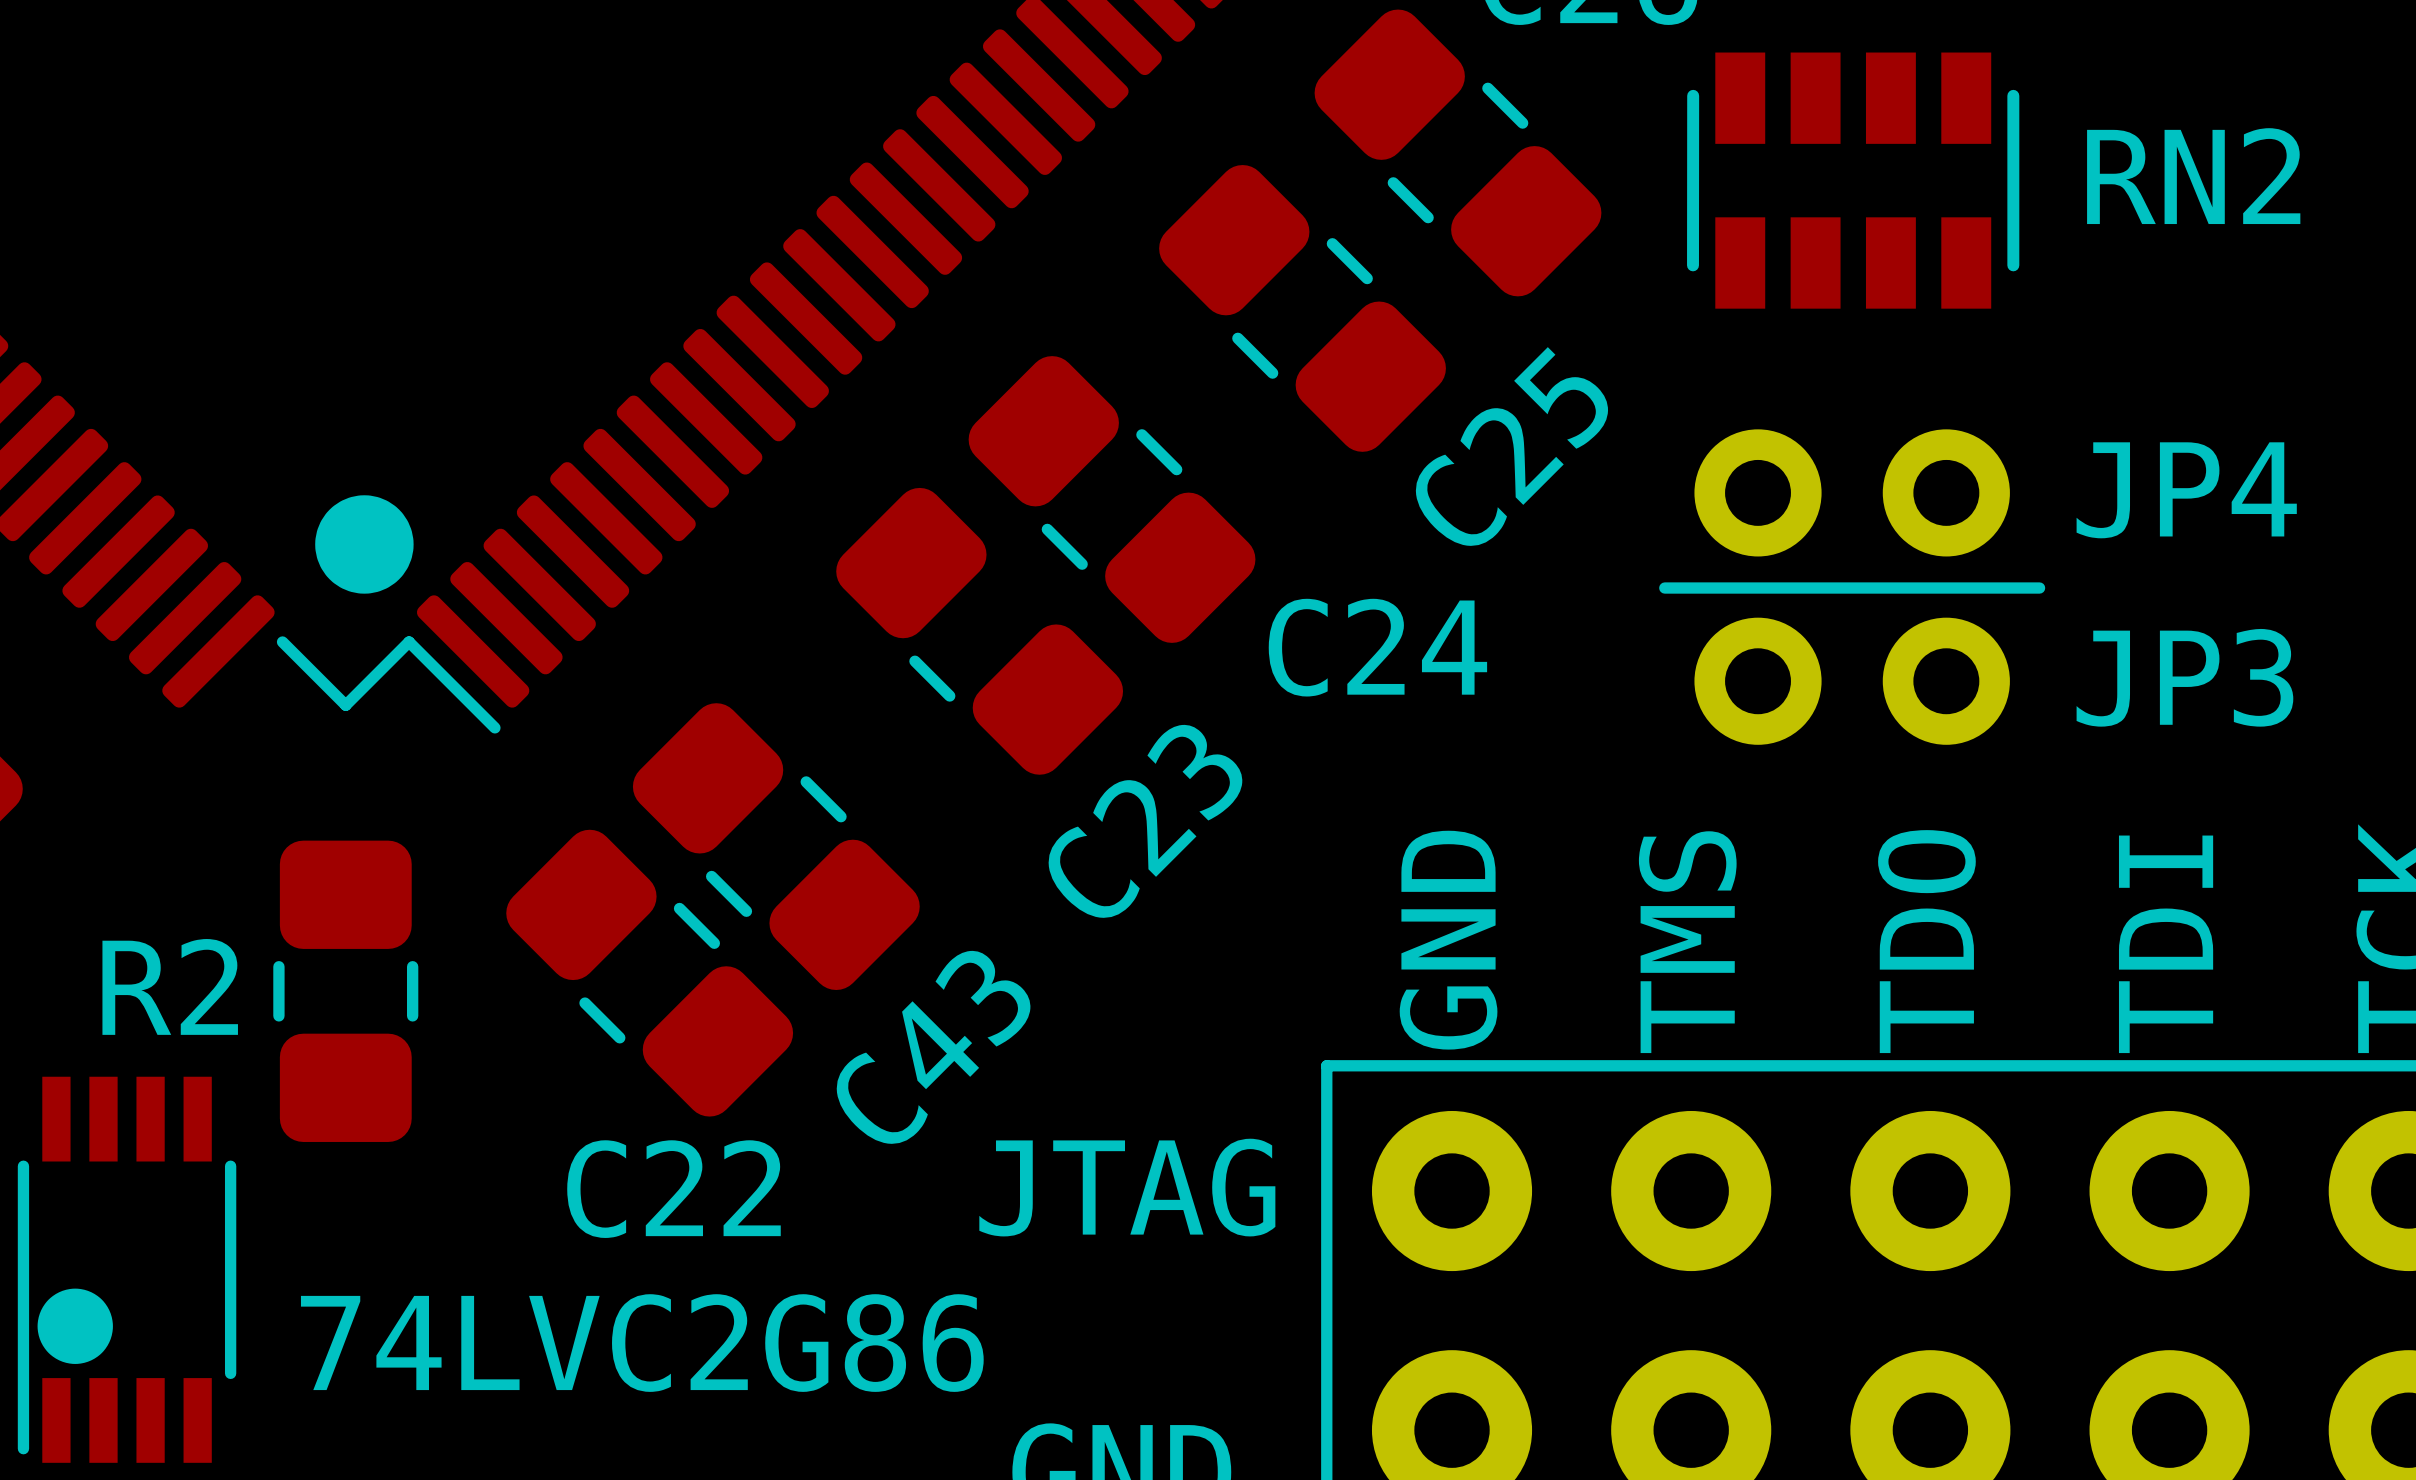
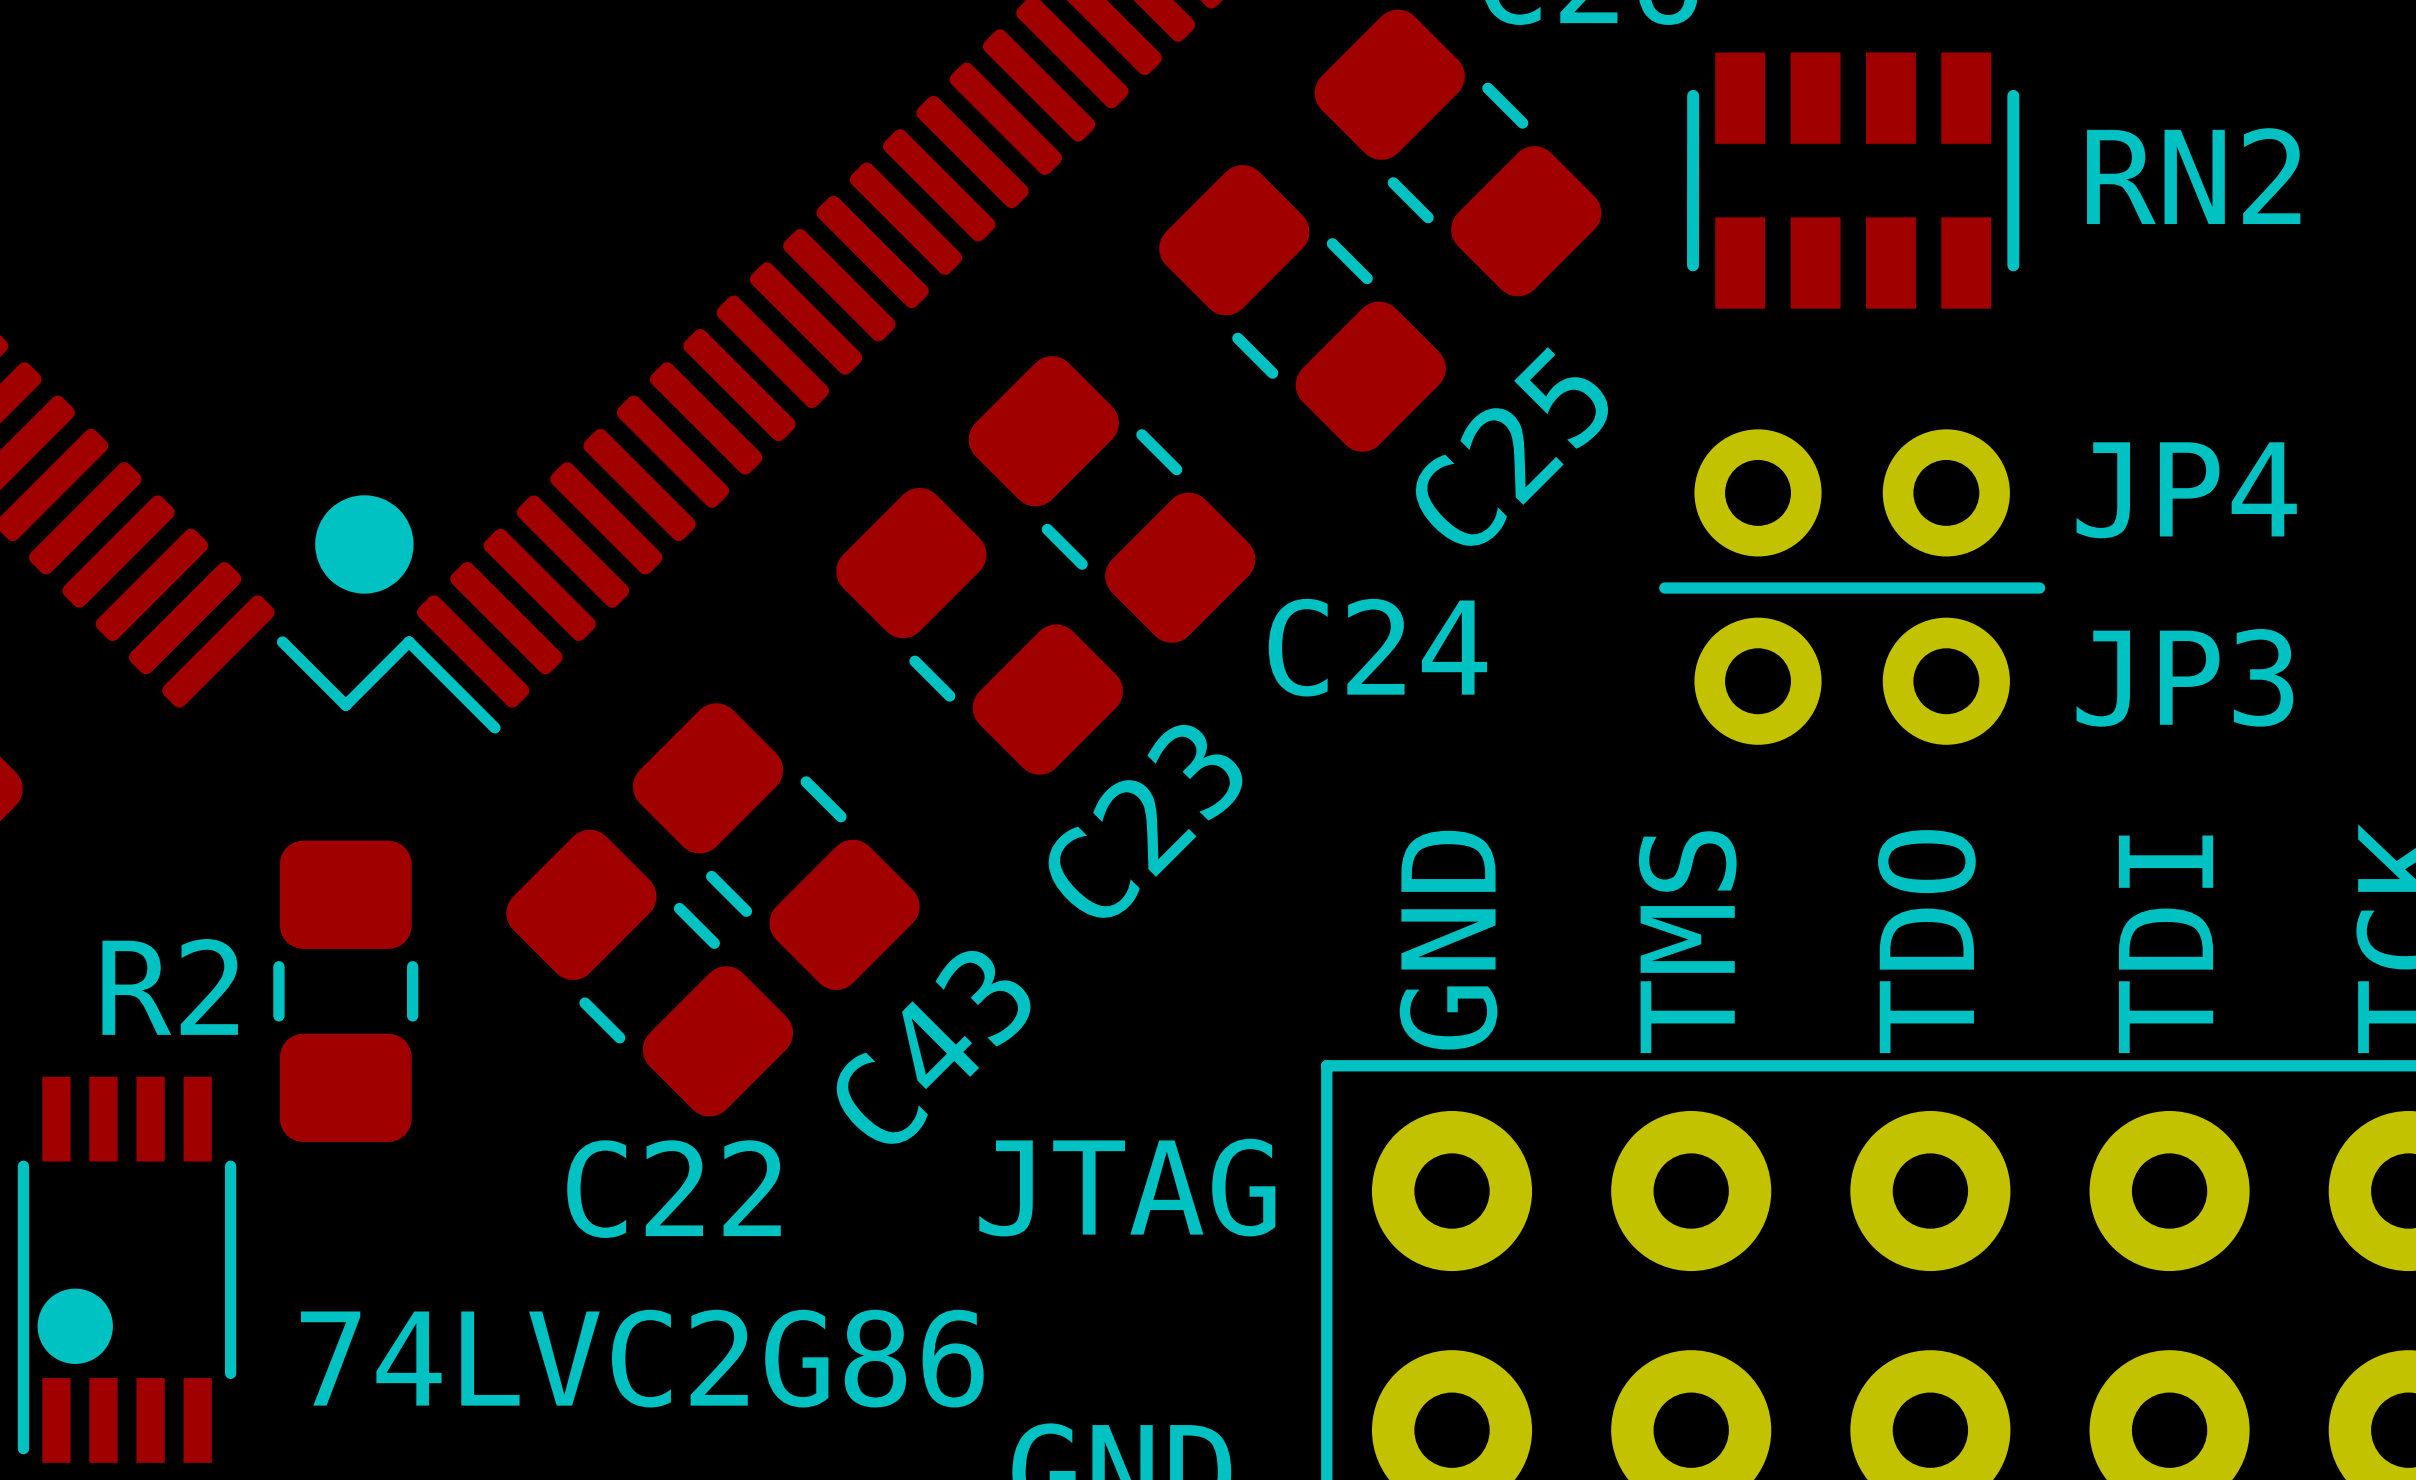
text position: 74LVC2G86 (642, 1343) -> 74LVC2G86 (642, 1358)

